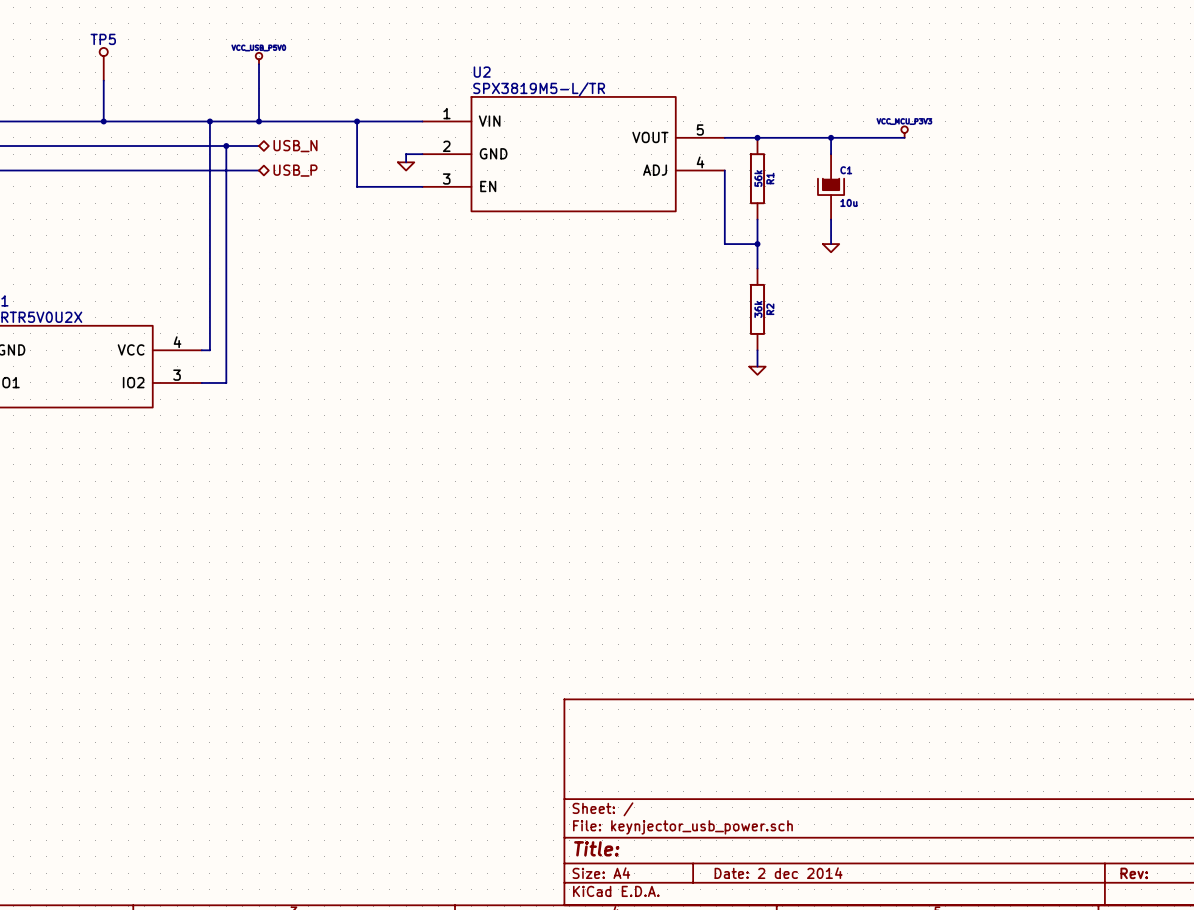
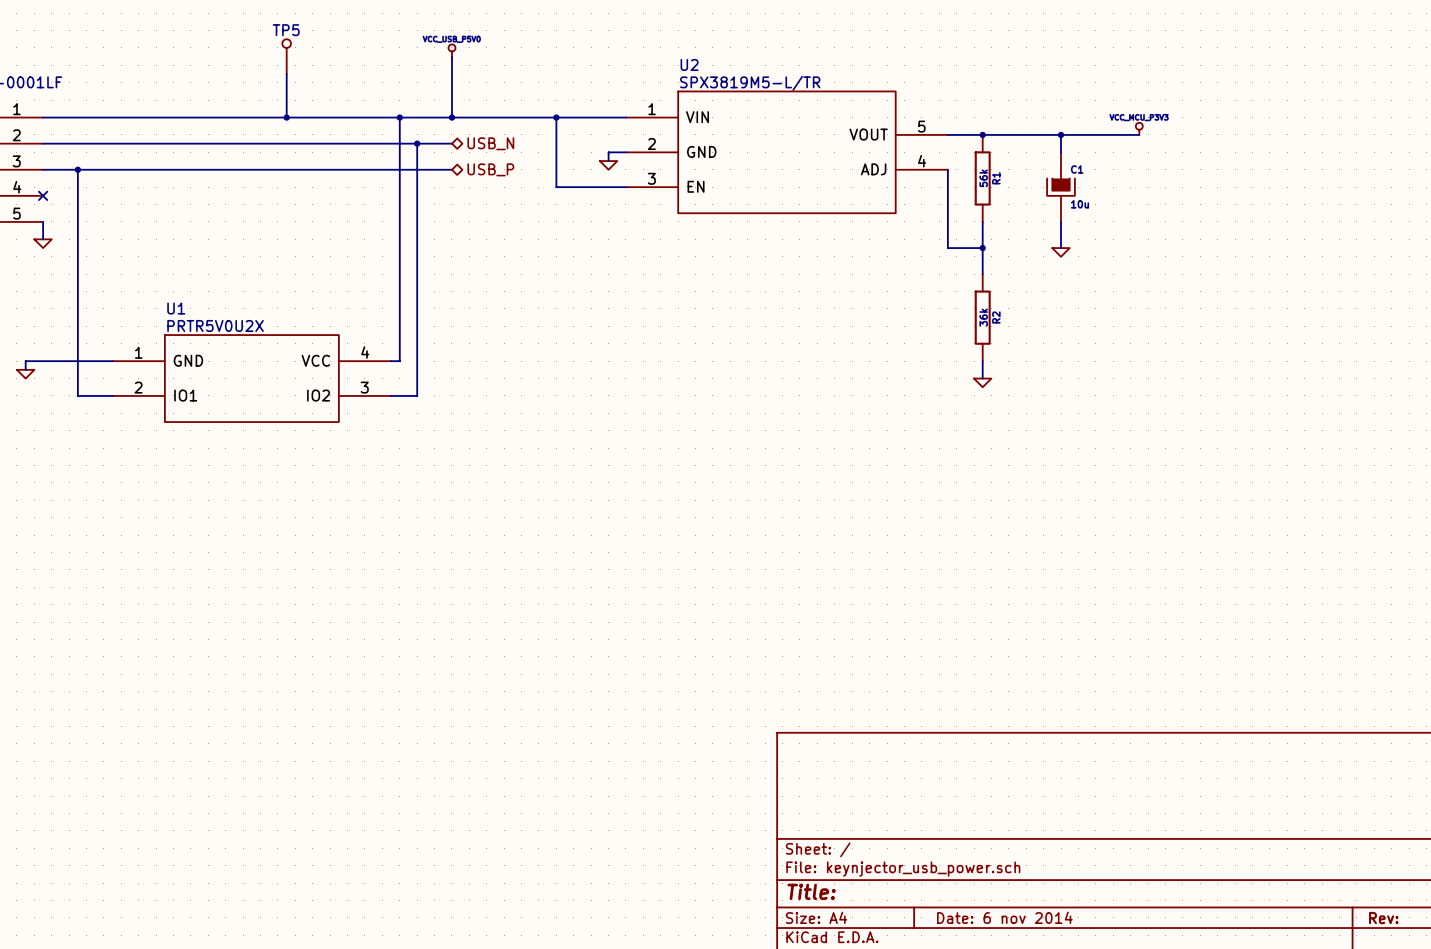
title block: Date: 2 dec 2014 (778, 873) -> Date: 6 nov 2014 (1004, 917)

